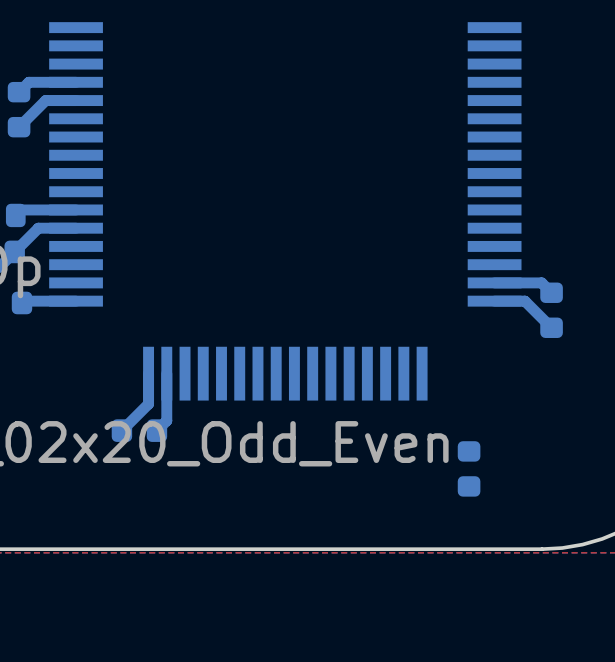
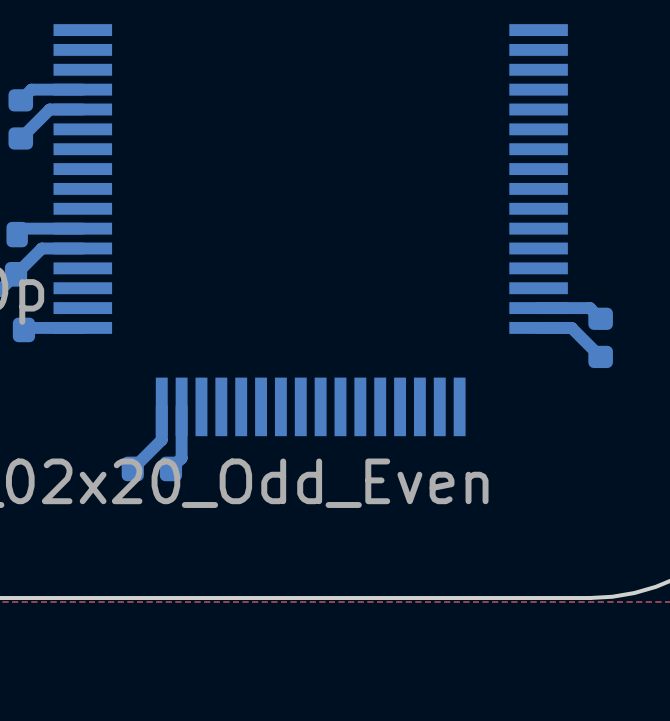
part: (469, 468) -> none

